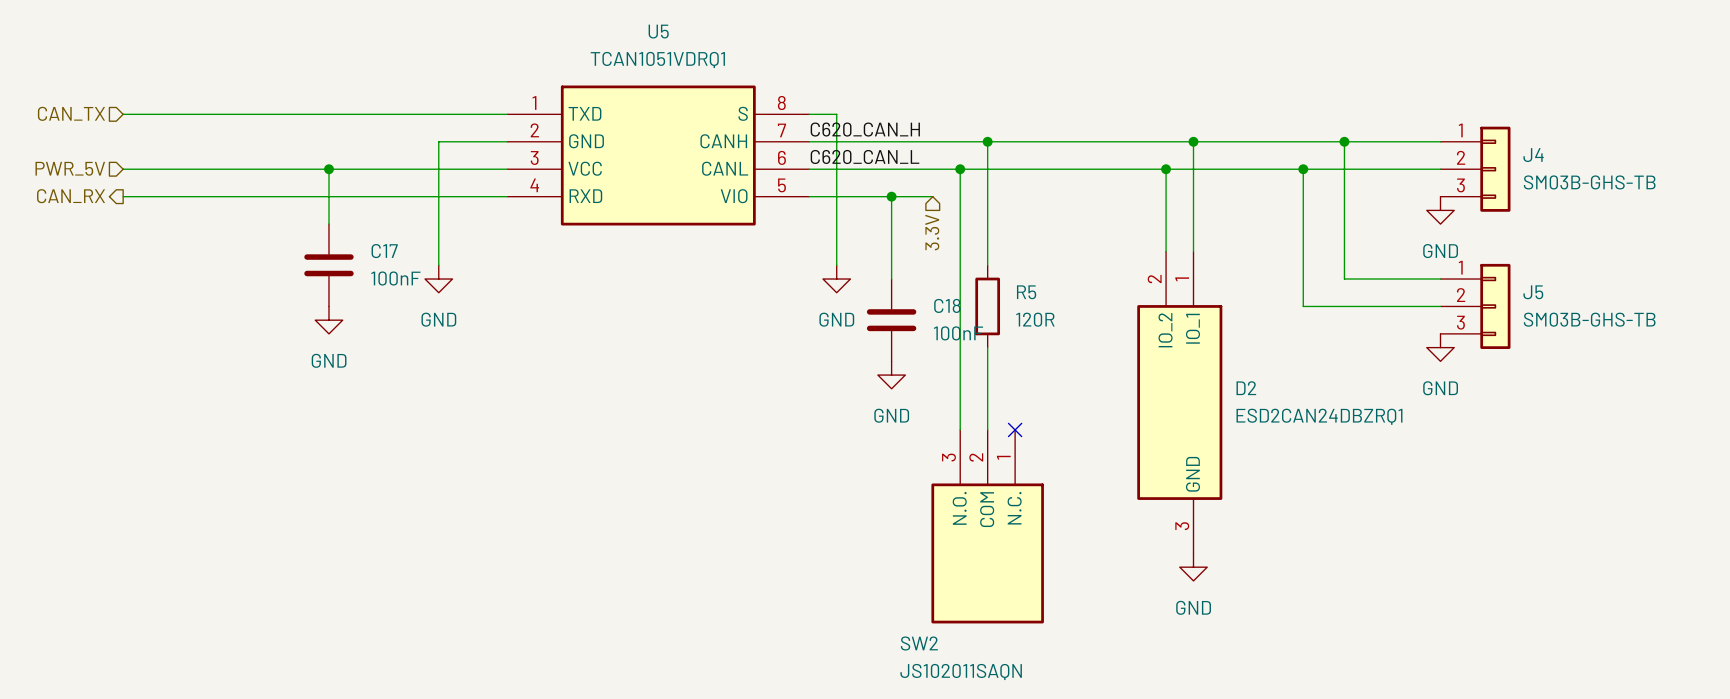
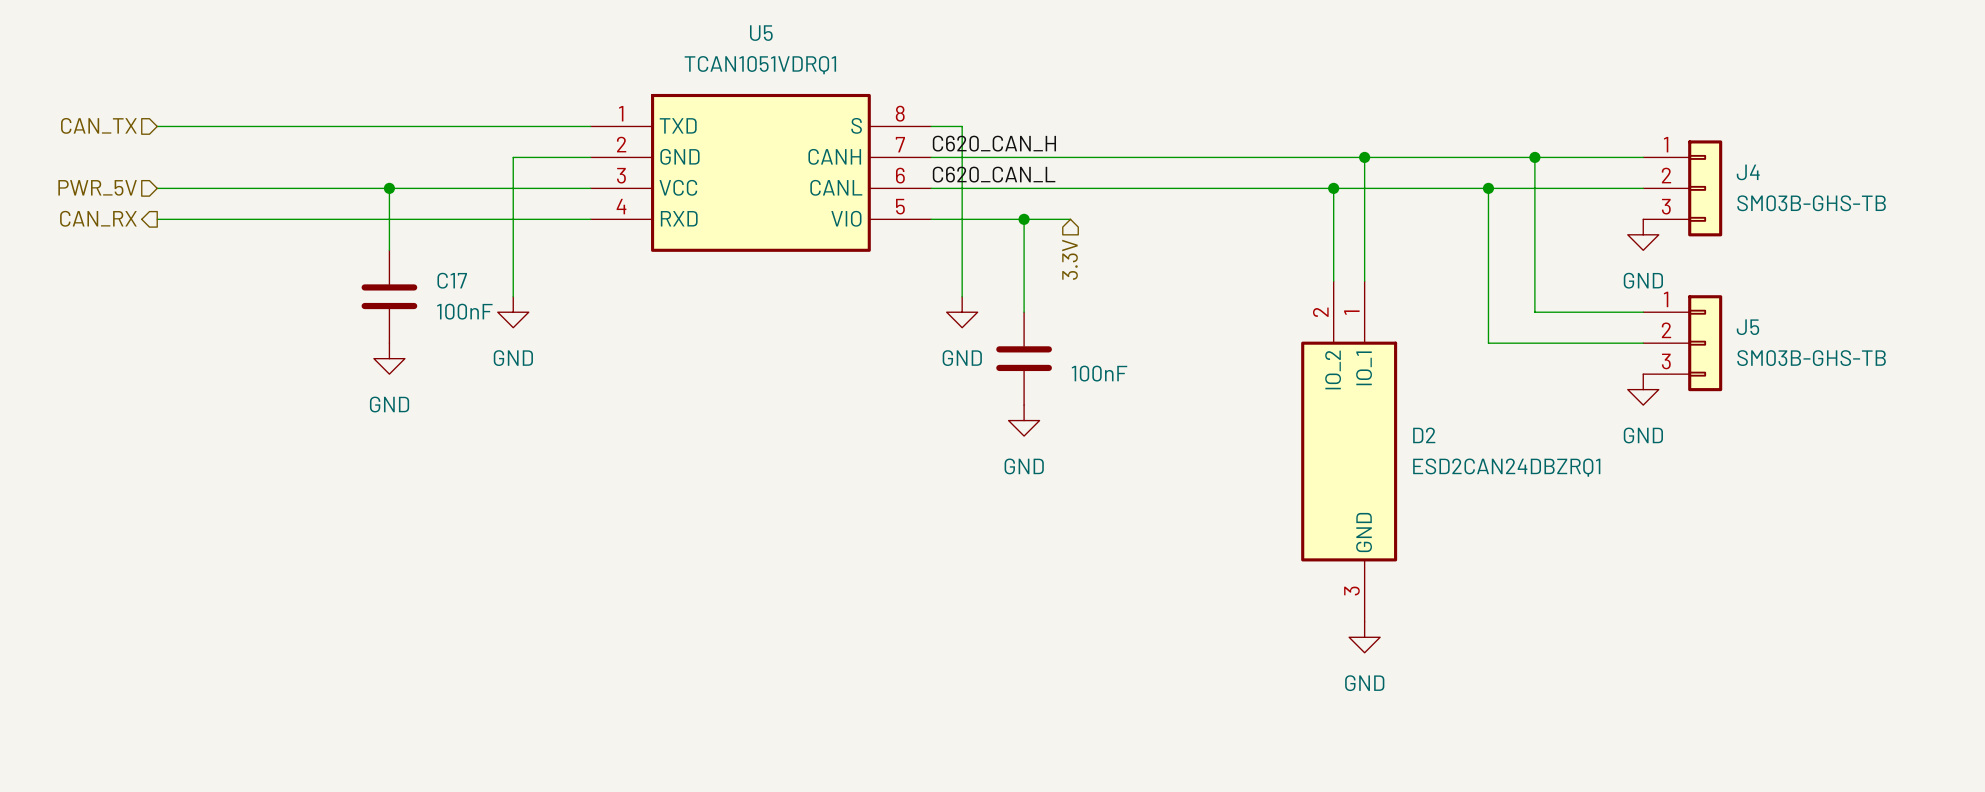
wire: (987, 141) (987, 265) -> none
junction: (987, 141) -> none
wire: (960, 169) (960, 429) -> none
junction: (960, 169) -> none
C18 name: C18 (947, 305) -> none
R5: 120R (987, 306) -> none
wire: (987, 347) (987, 429) -> none
no-connect mark: (1015, 429) -> none
SW2: JS102011SAQN (987, 526) -> none

